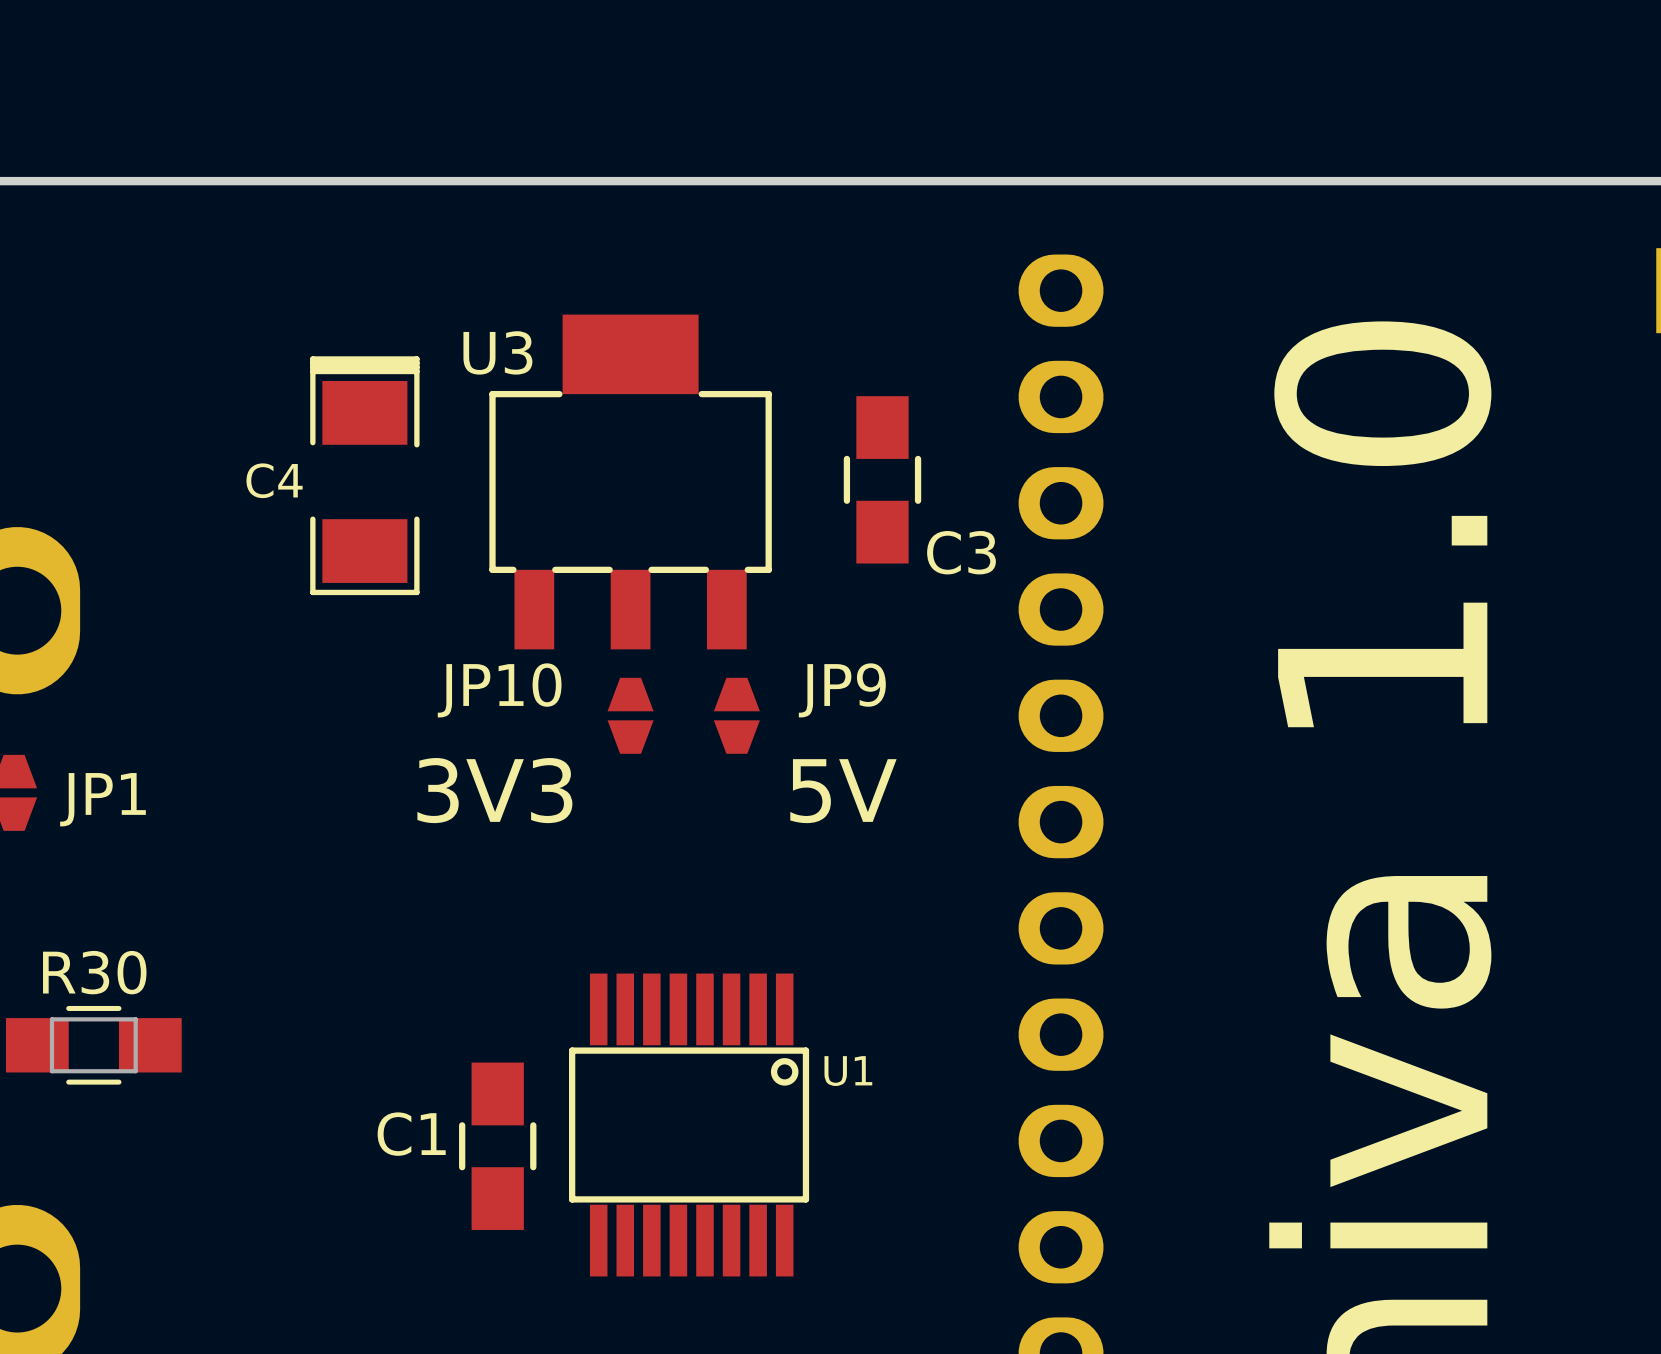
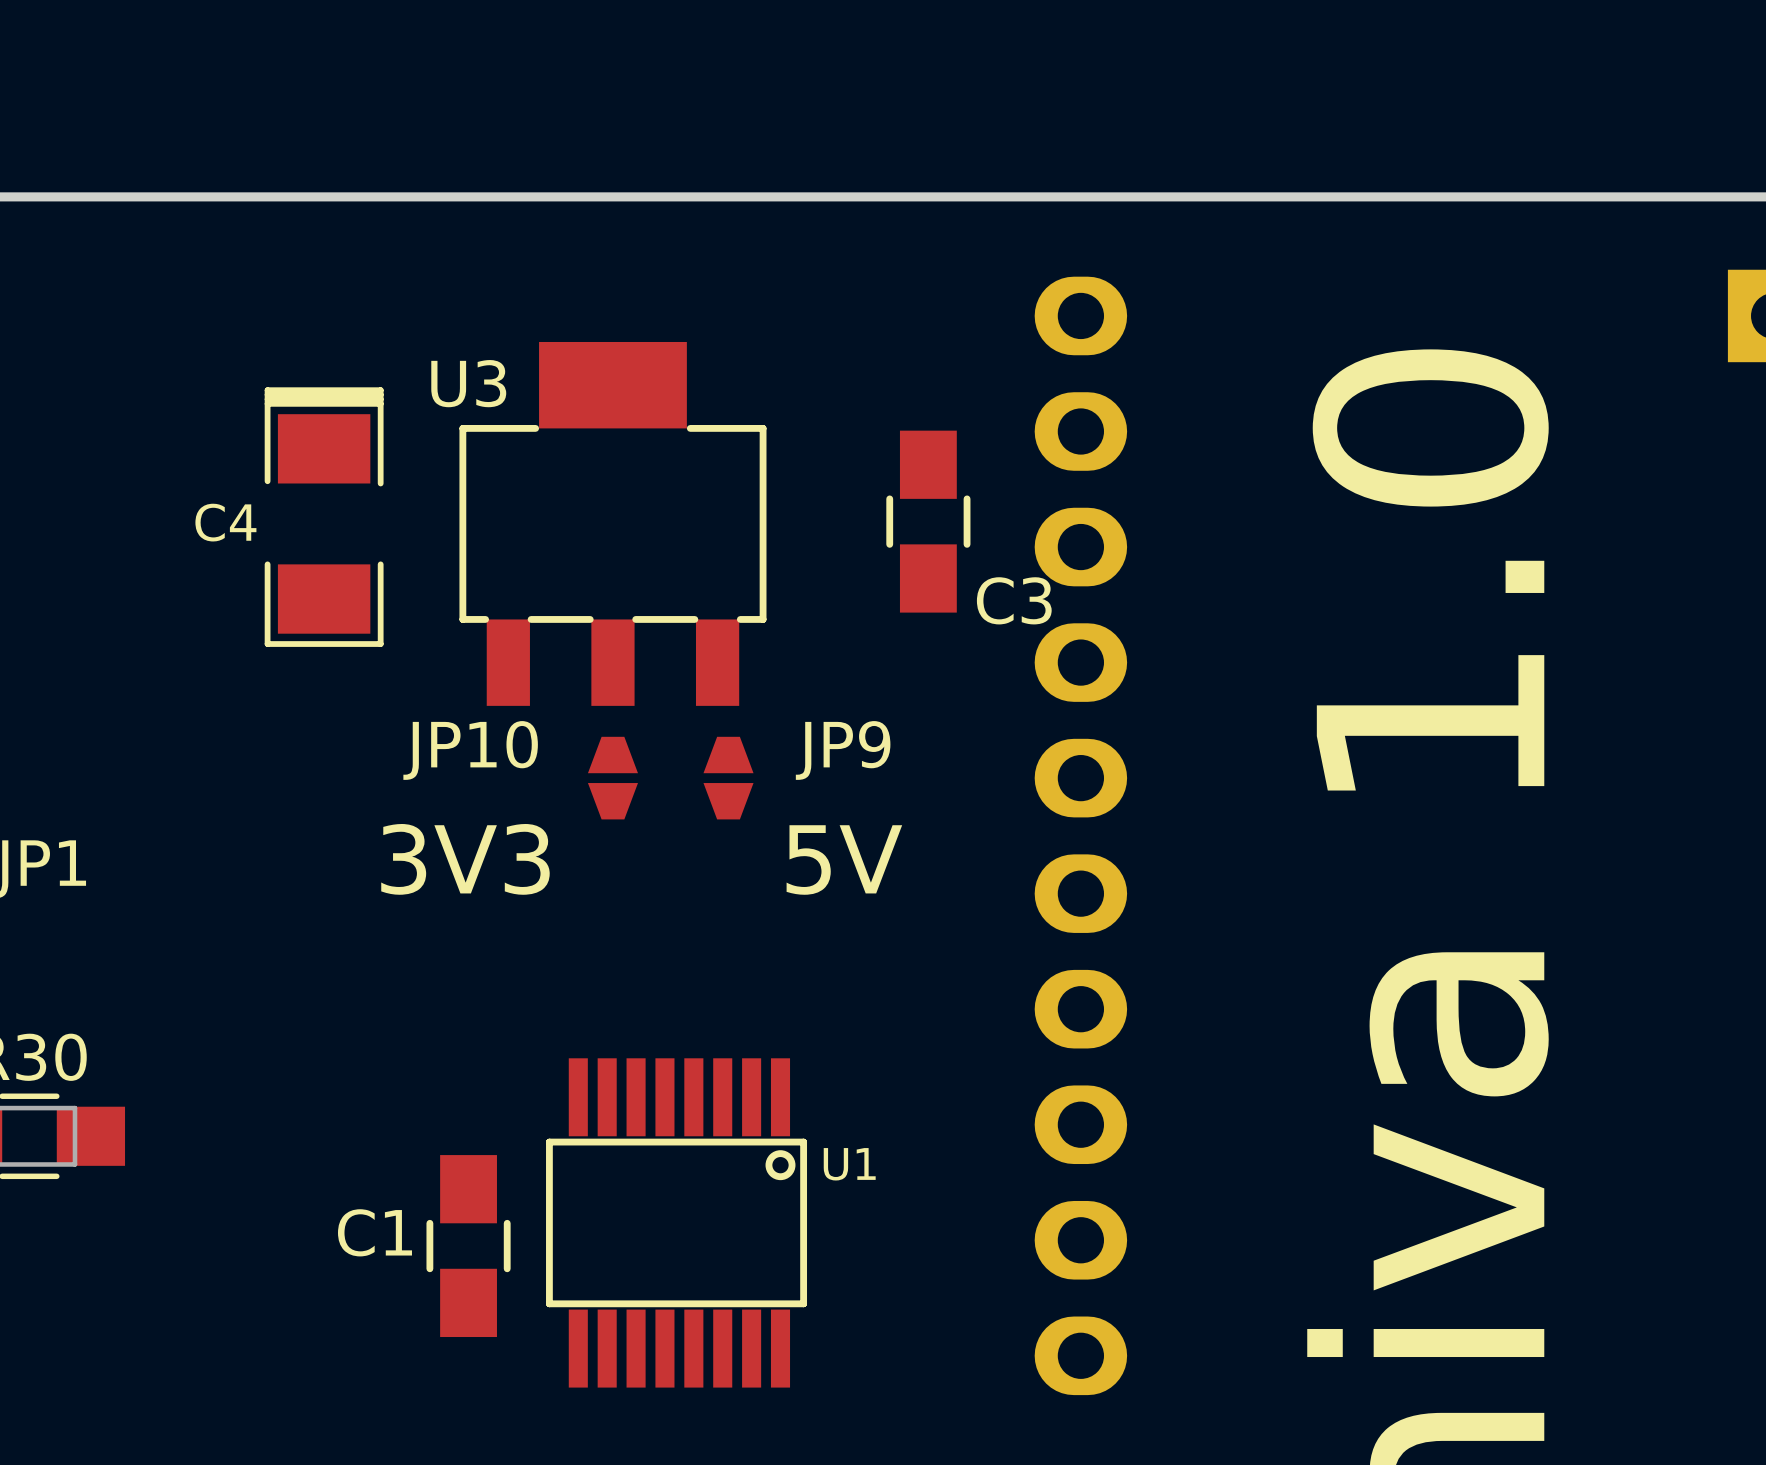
C3 position: (882, 479) -> (928, 521)

